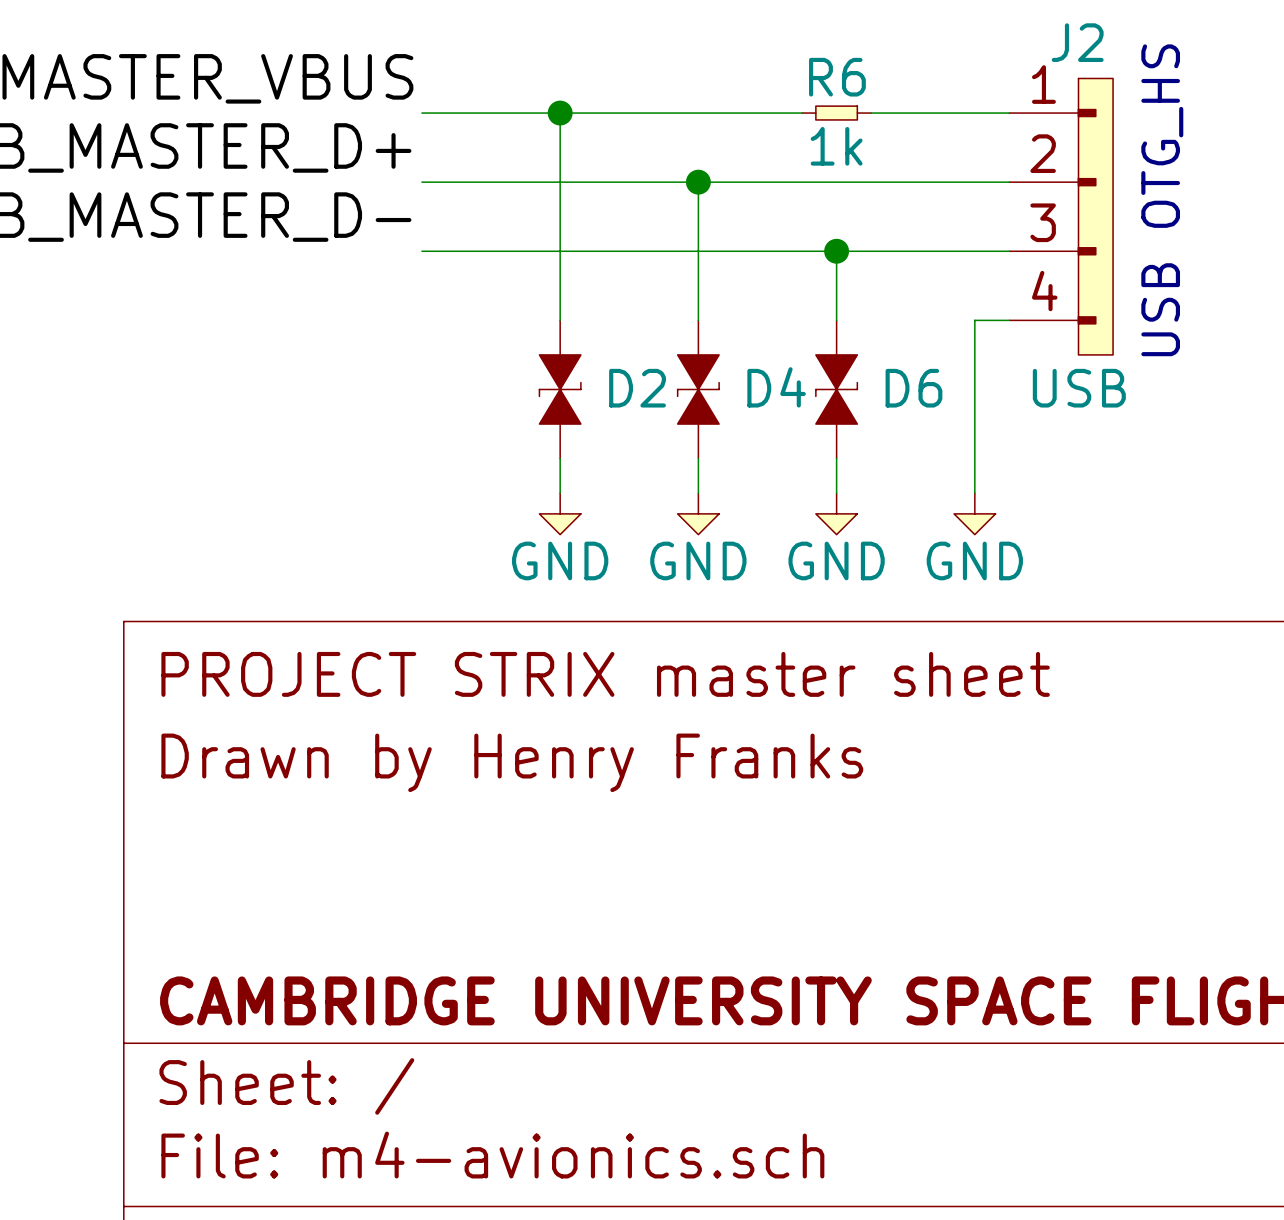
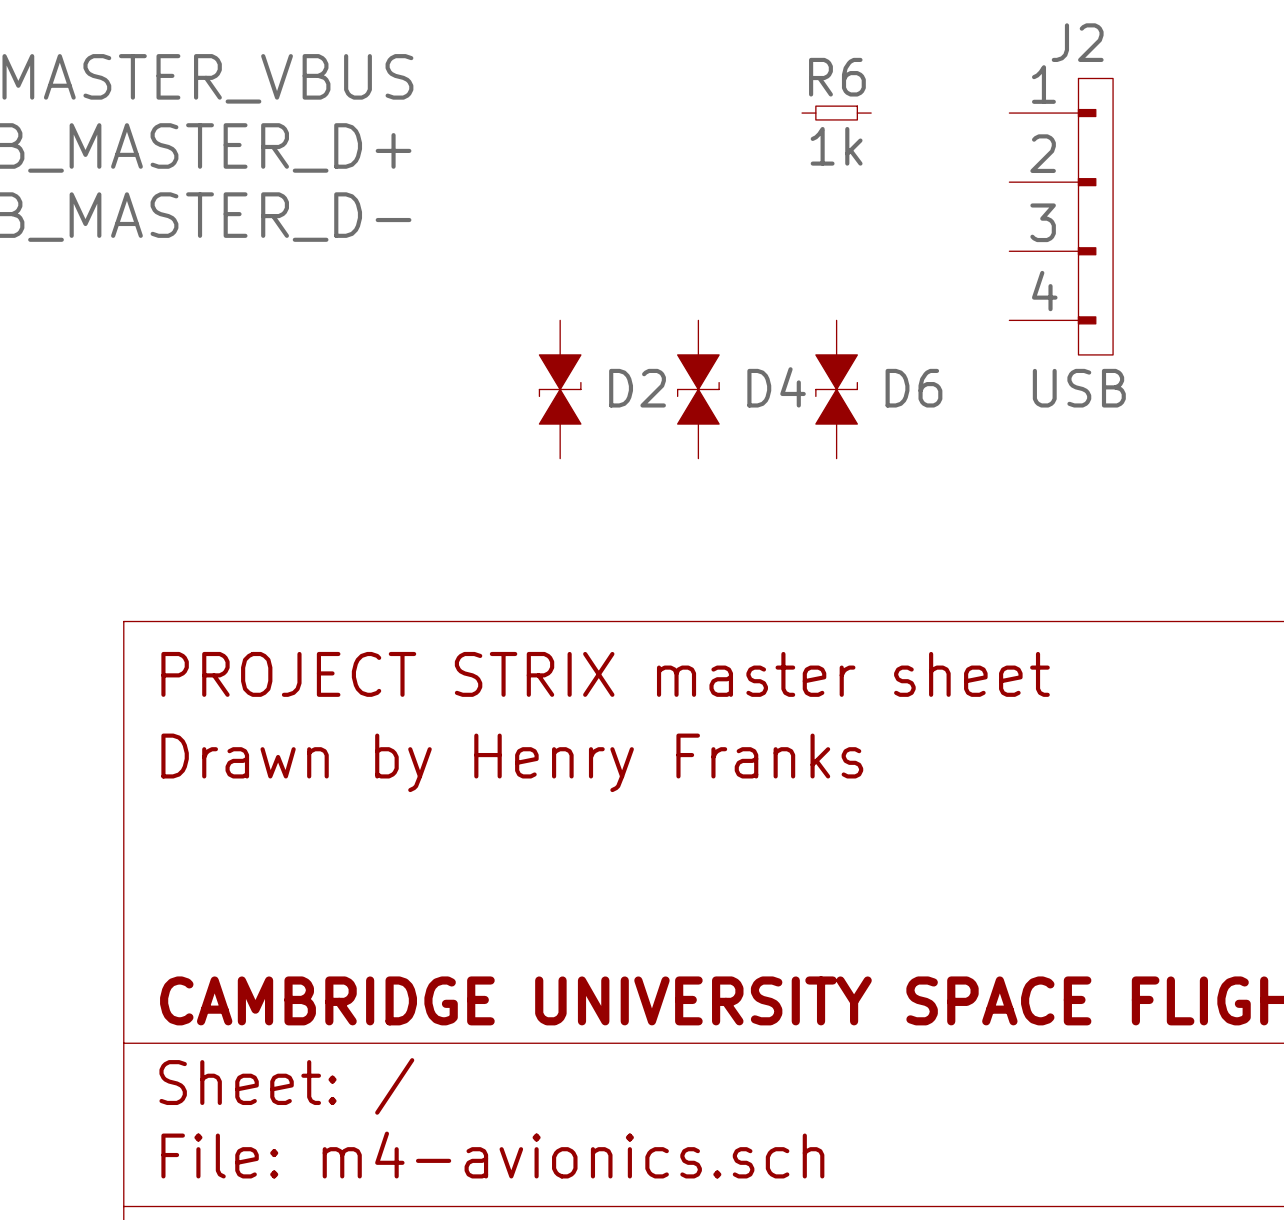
wire: (421, 113) (802, 113) -> none
wire: (560, 113) (560, 320) -> none
junction: (560, 113) -> none
wire: (871, 113) (1009, 113) -> none
wire: (421, 182) (1009, 182) -> none
wire: (698, 182) (698, 320) -> none
junction: (698, 182) -> none
text: USB OTG_HS (1162, 200) -> none
wire: (421, 251) (1009, 251) -> none
wire: (836, 251) (836, 320) -> none
junction: (836, 251) -> none
wire: (1009, 320) (974, 320) (974, 493) -> none
wire: (560, 458) (560, 493) -> none
wire: (698, 458) (698, 493) -> none
wire: (836, 458) (836, 493) -> none
power symbol: GND (560, 513) -> none
power symbol: GND (698, 513) -> none
power symbol: GND (836, 513) -> none
power symbol: GND (974, 513) -> none

